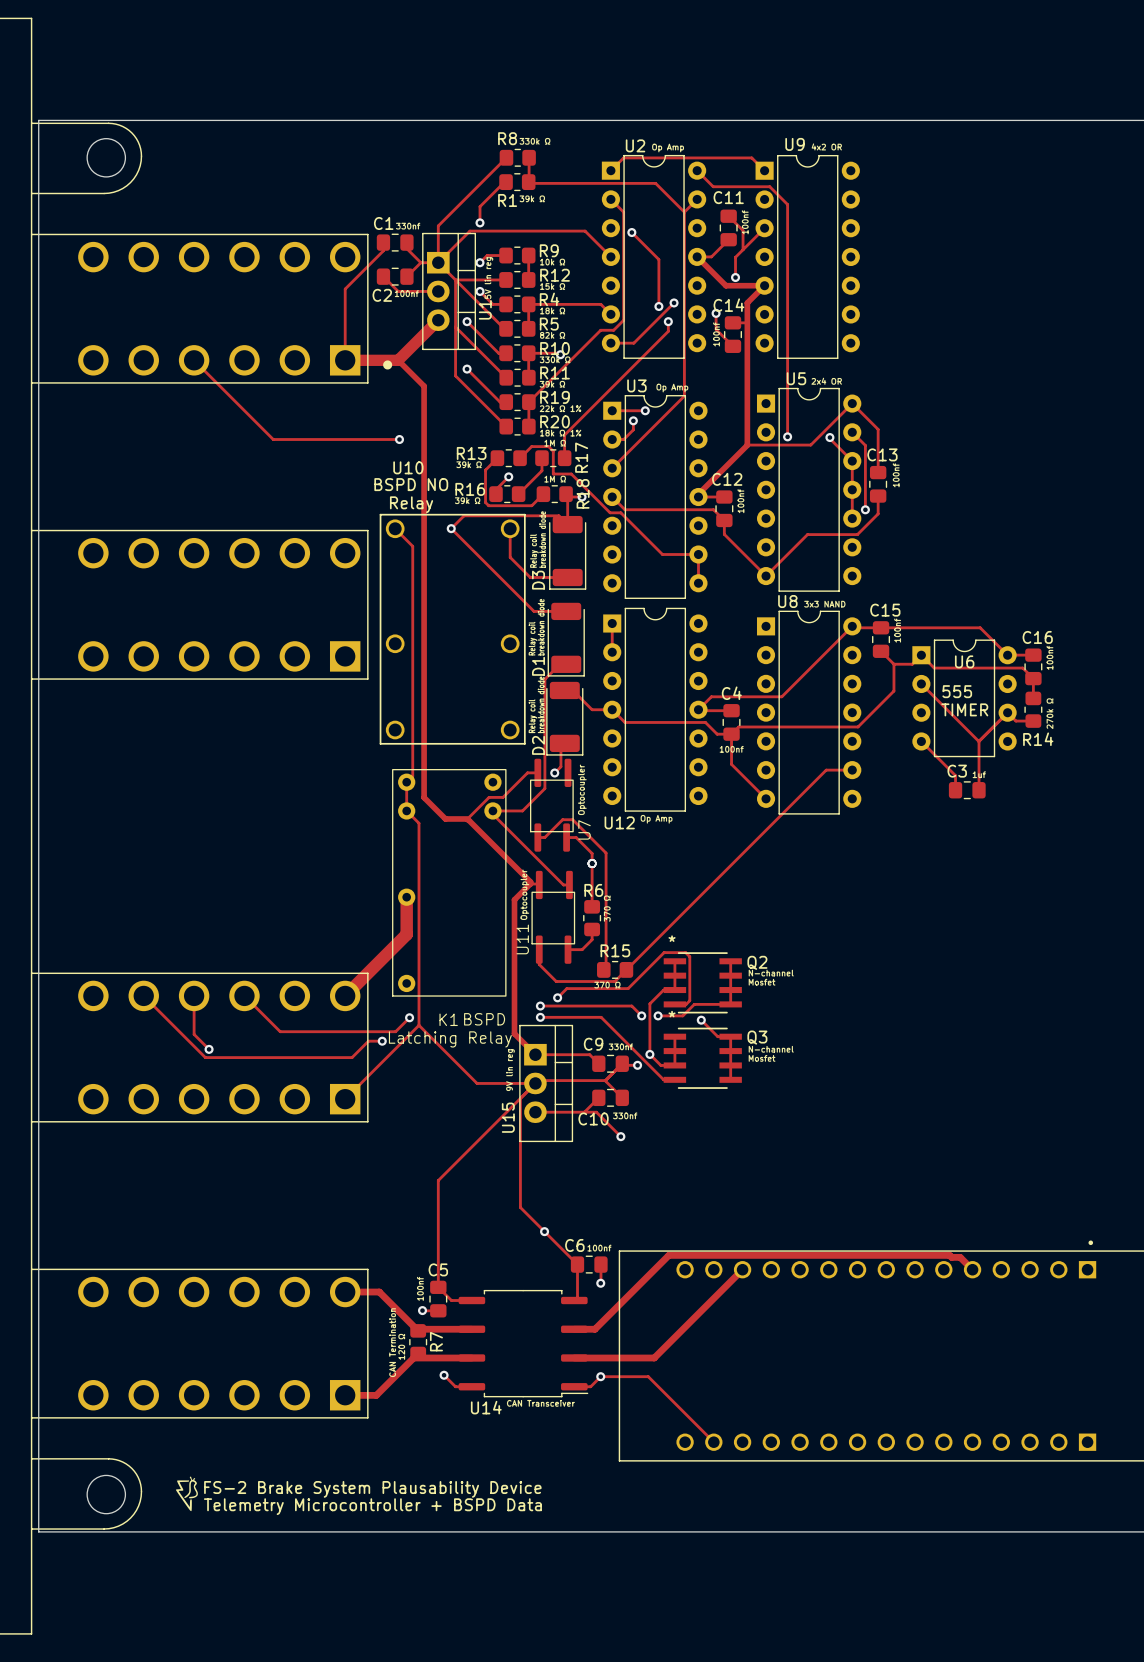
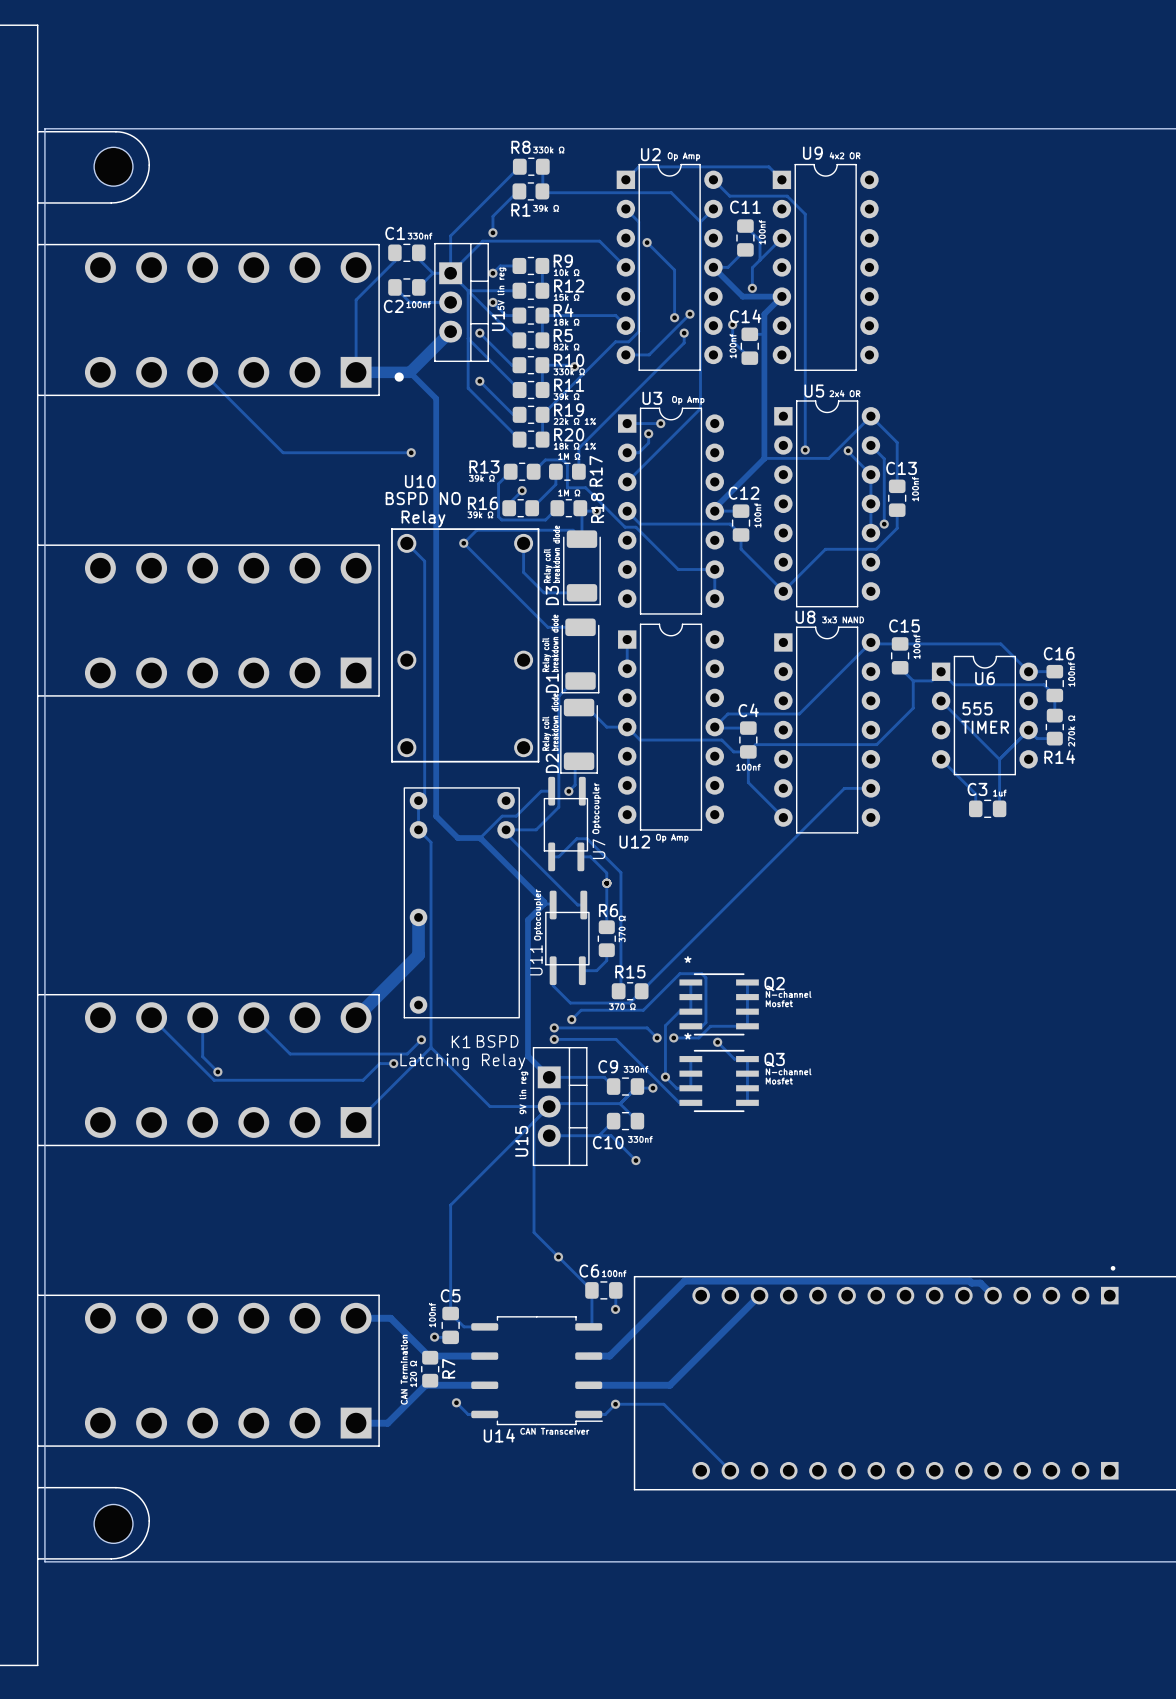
drawing: [175, 1476, 198, 1512] -> none
text: FS-2 Brake System Plausability Device (372, 1489) -> none
text: Telemetry Microcontroller + BSPD Data (372, 1506) -> none

